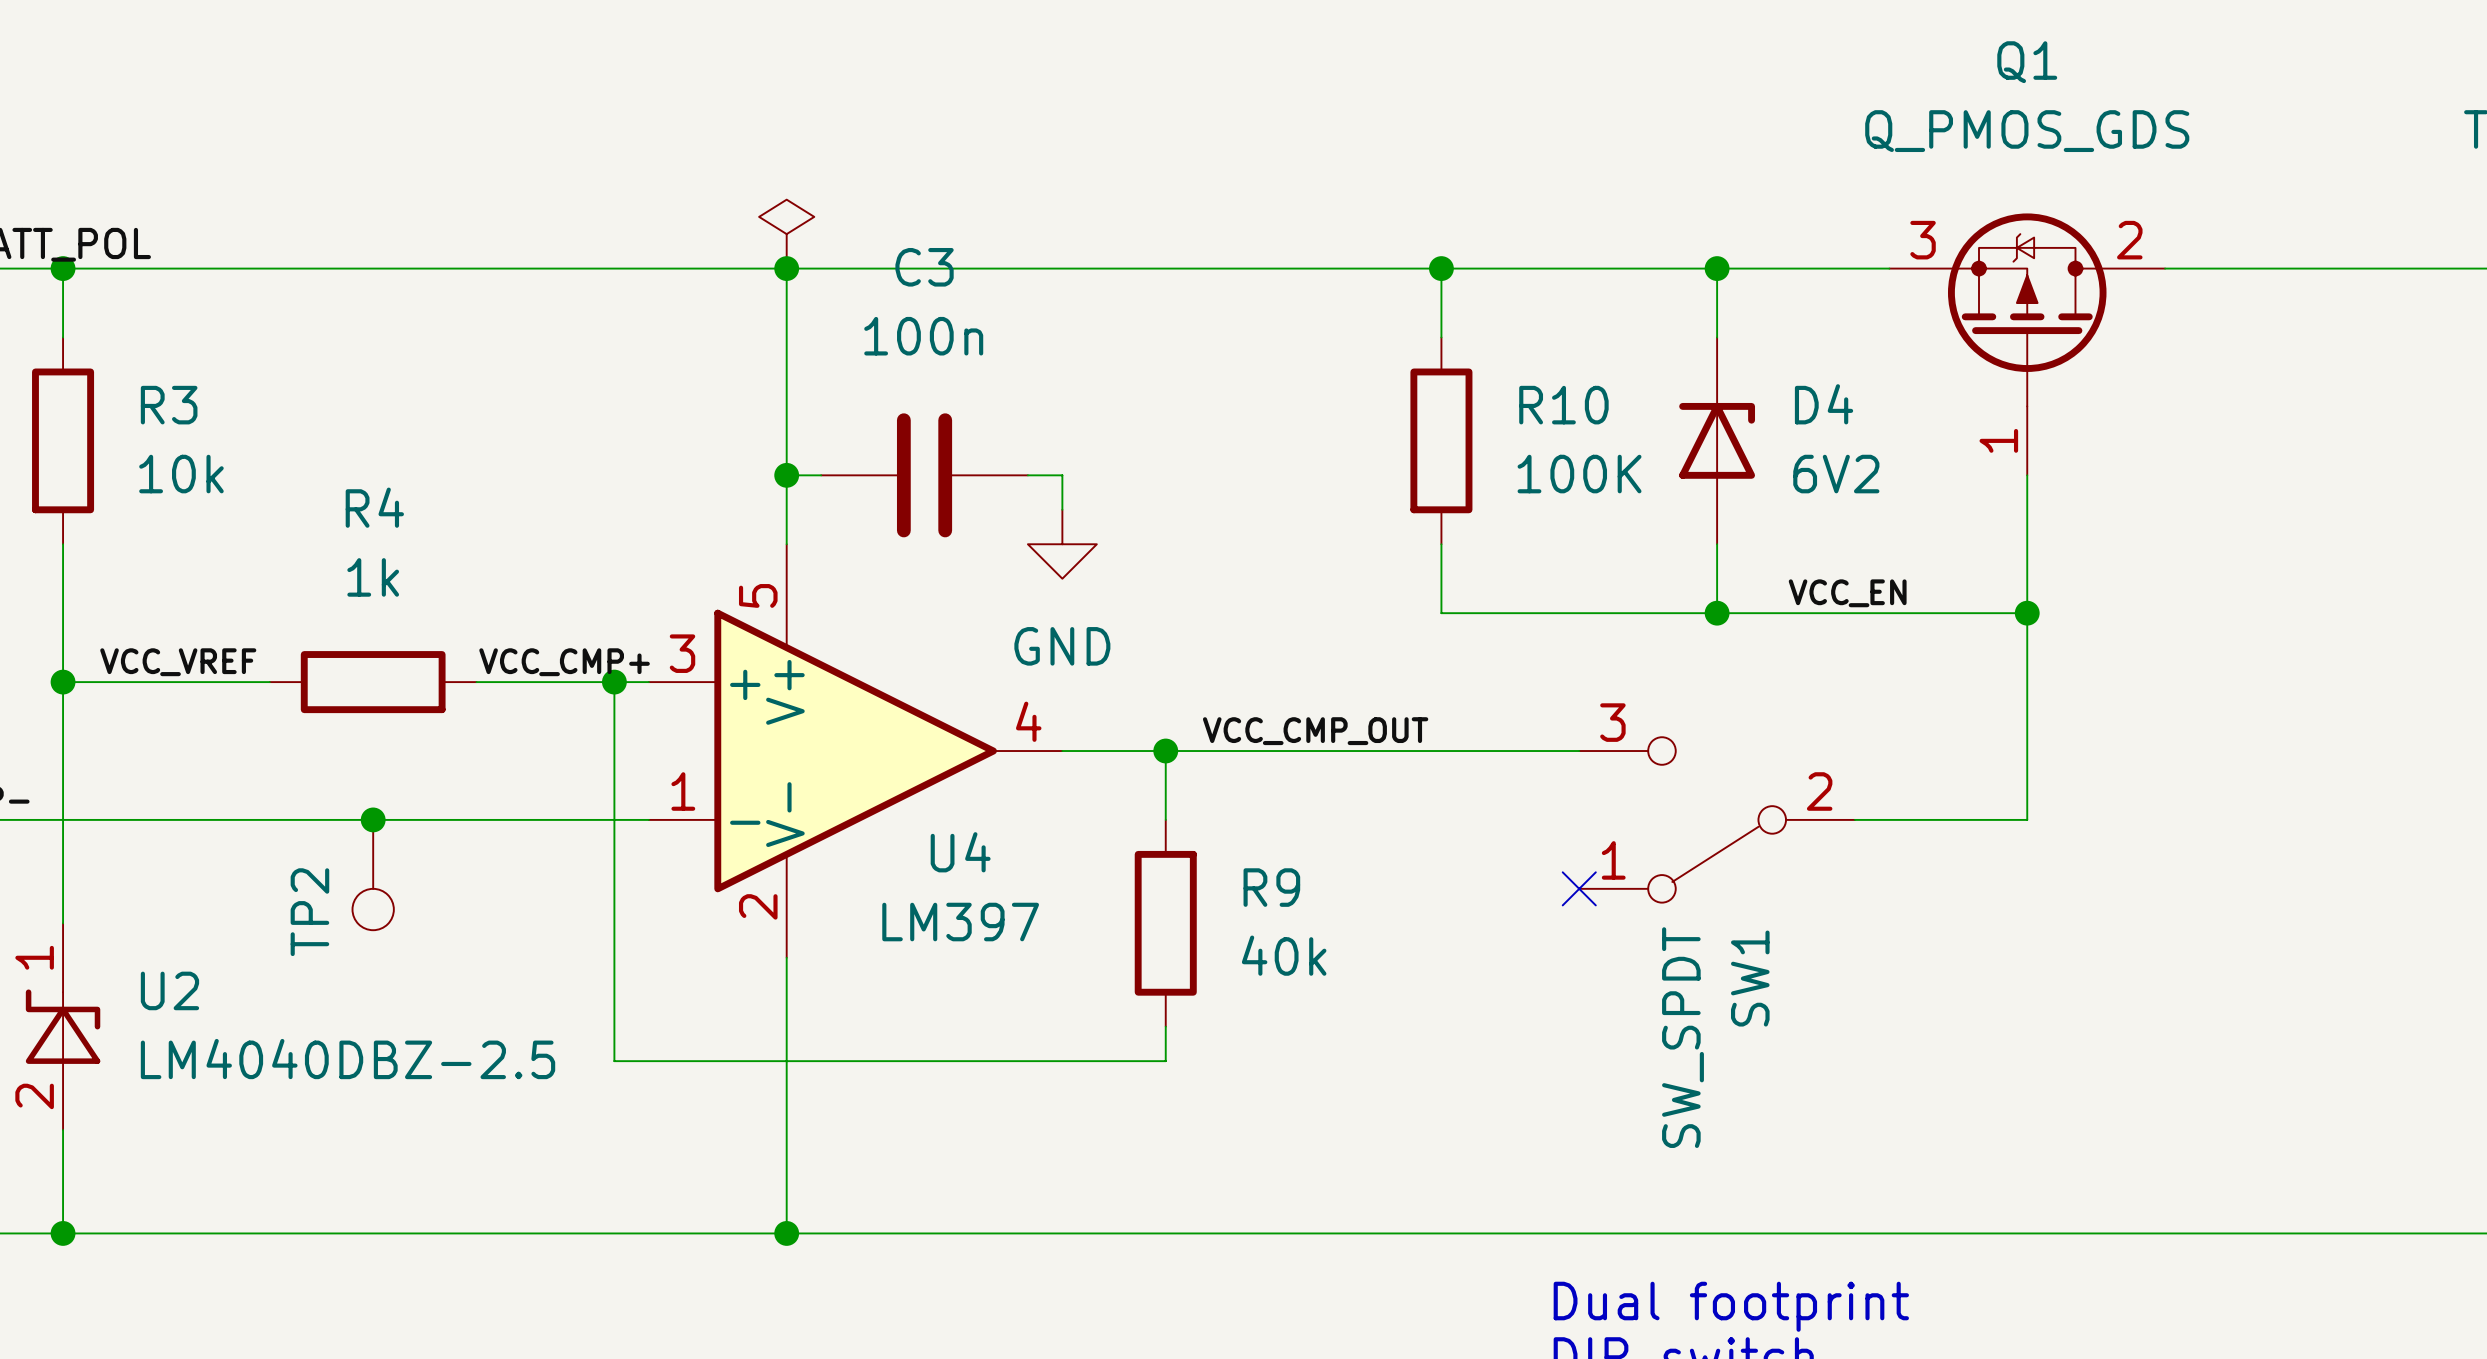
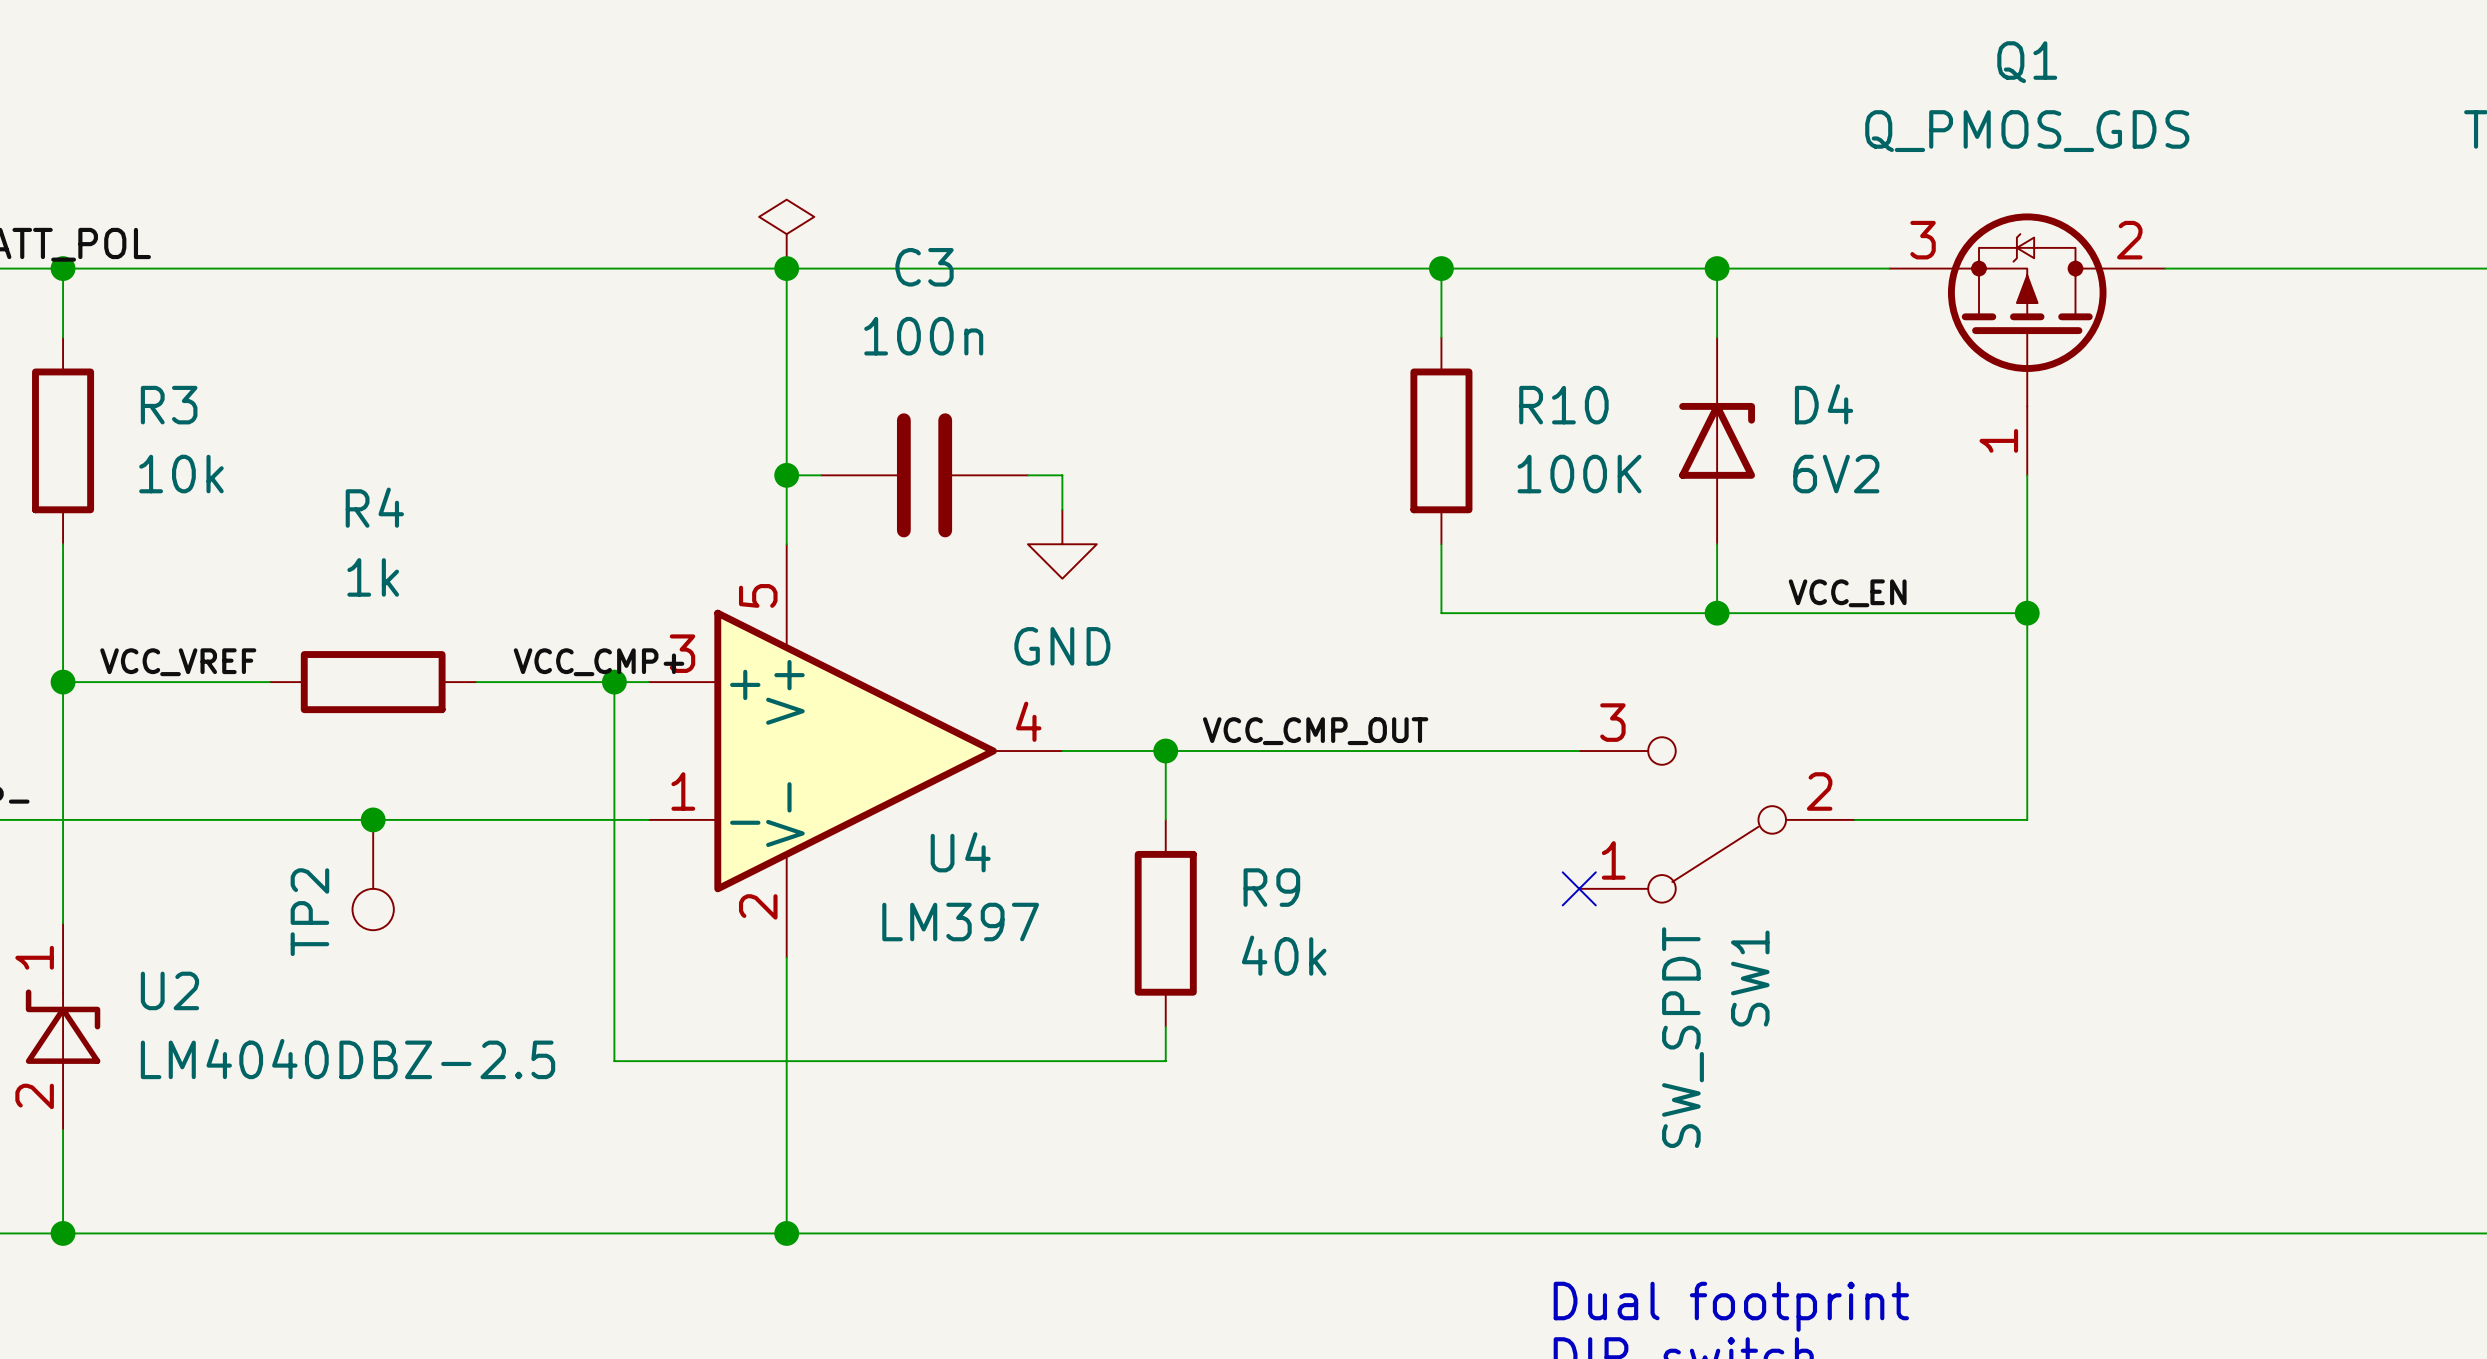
label position: VCC_CMP+ (564, 662) -> VCC_CMP+ (599, 662)

